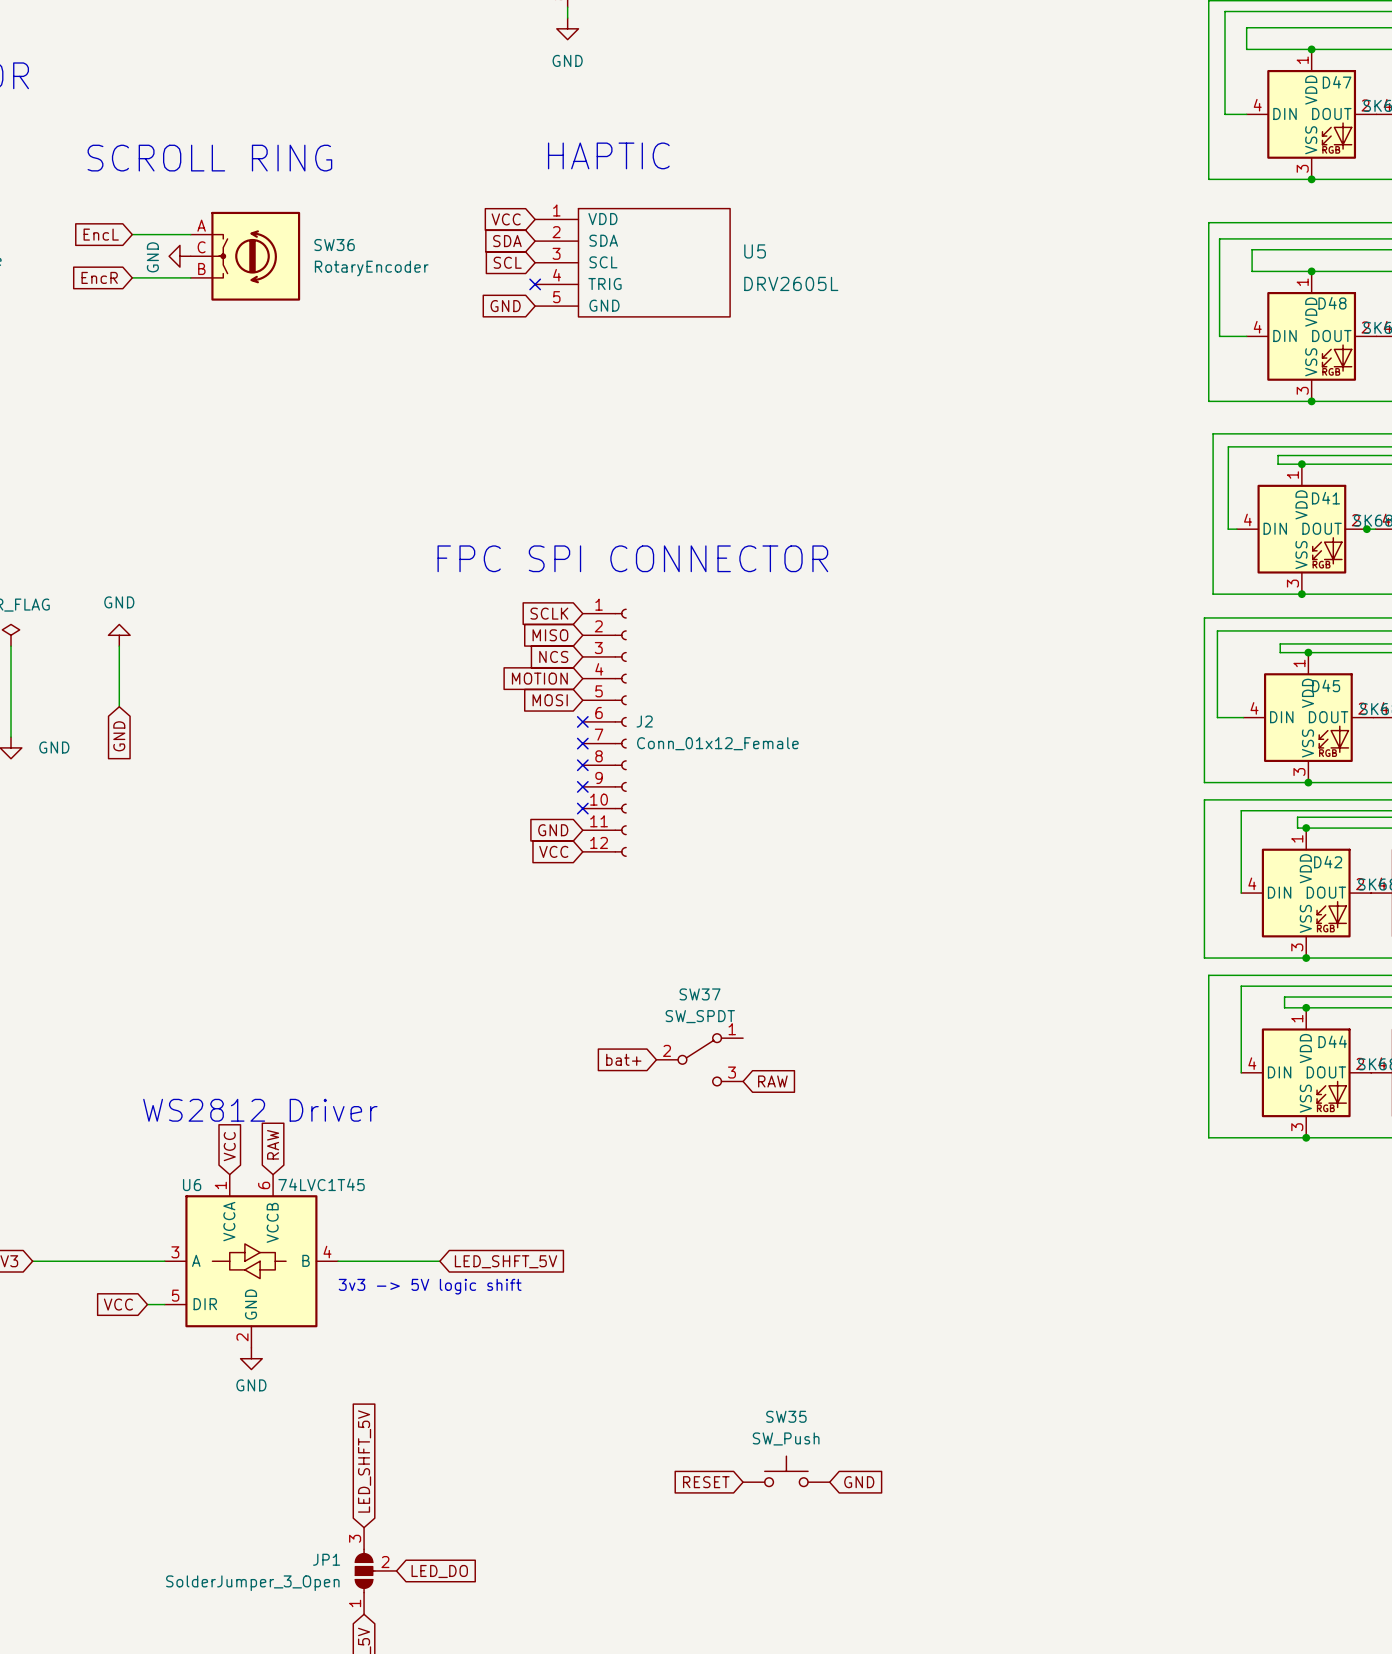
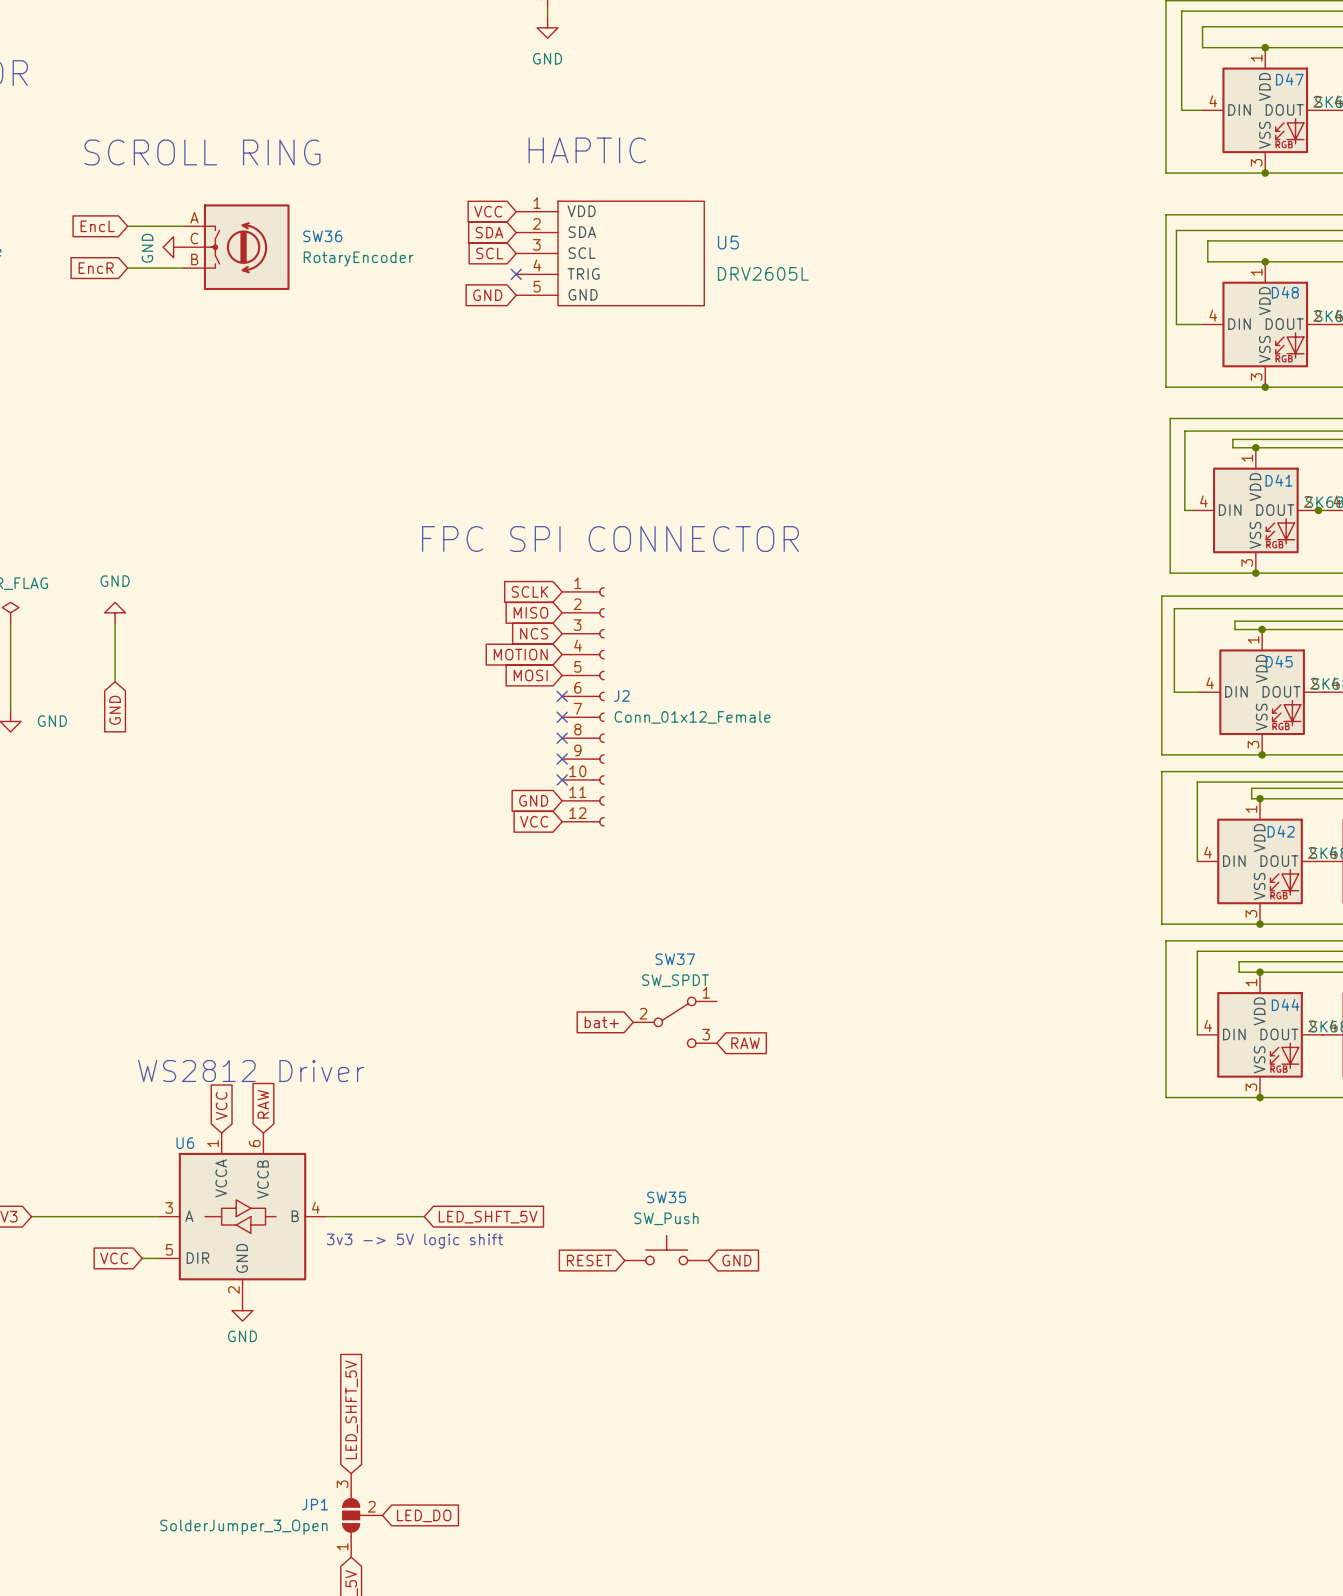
U6 value: 74LVC1T45 (321, 1184) -> none
SW35 position: (786, 1471) -> (666, 1250)
global label position: RESET (706, 1482) -> RESET (589, 1260)
global label position: GND (859, 1482) -> GND (736, 1260)

